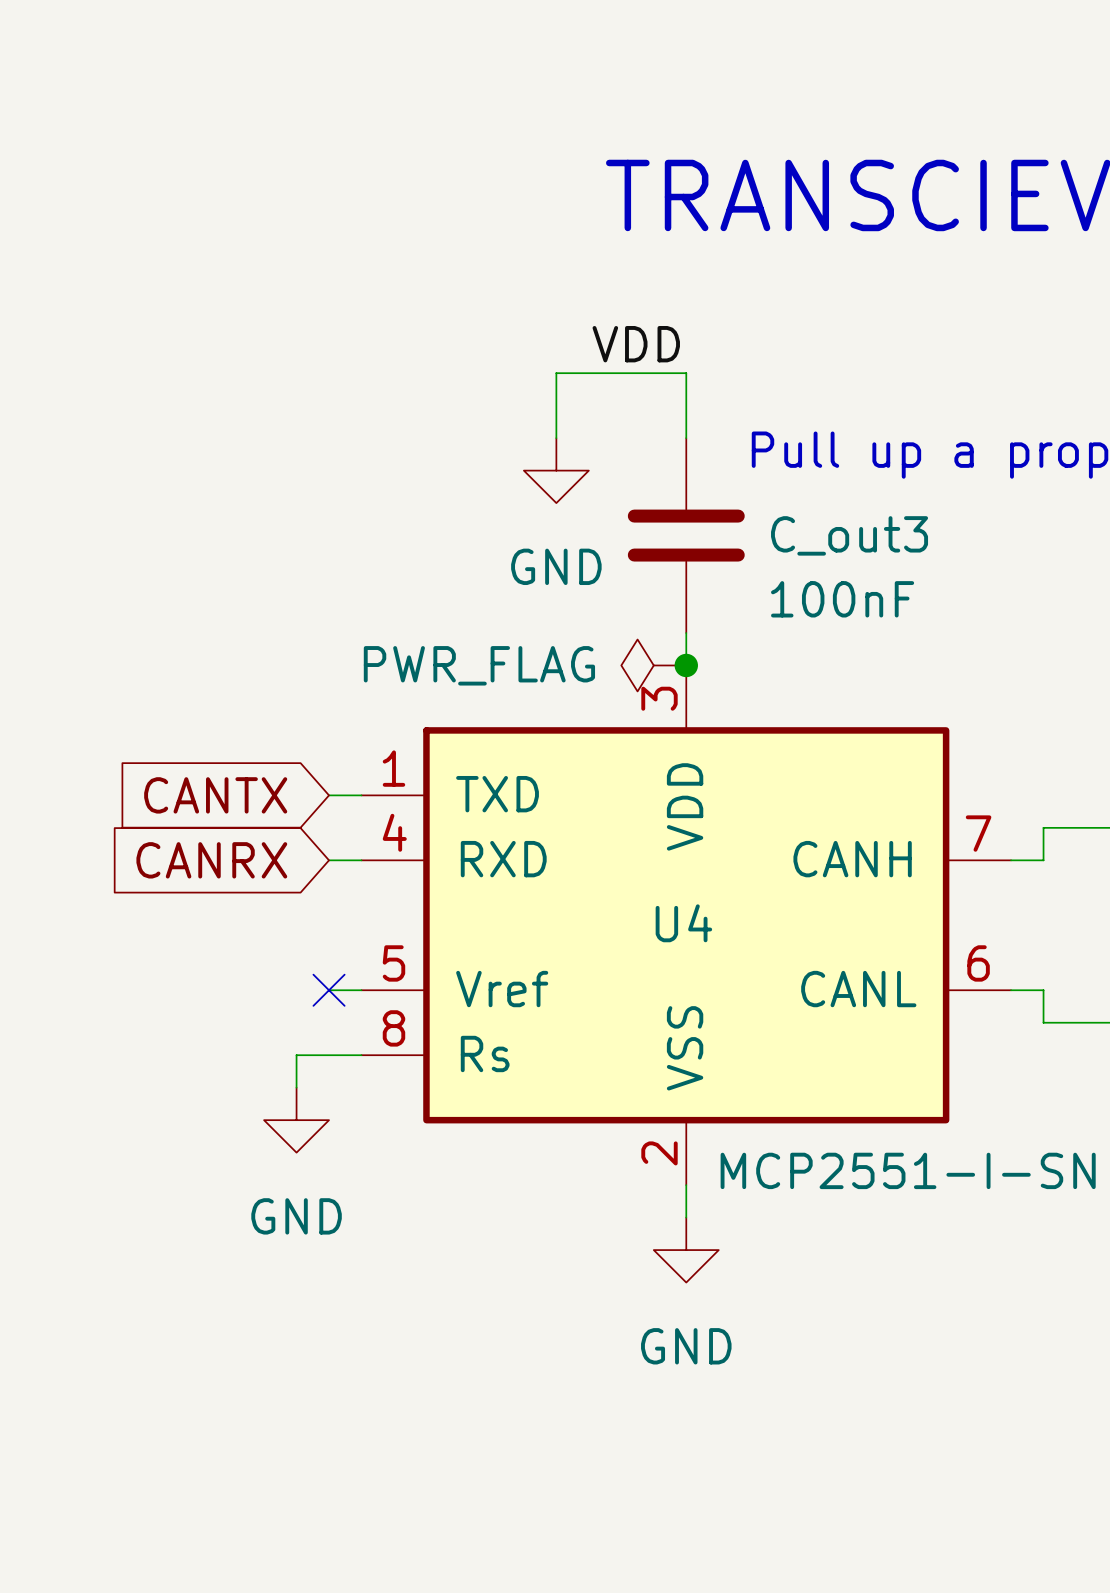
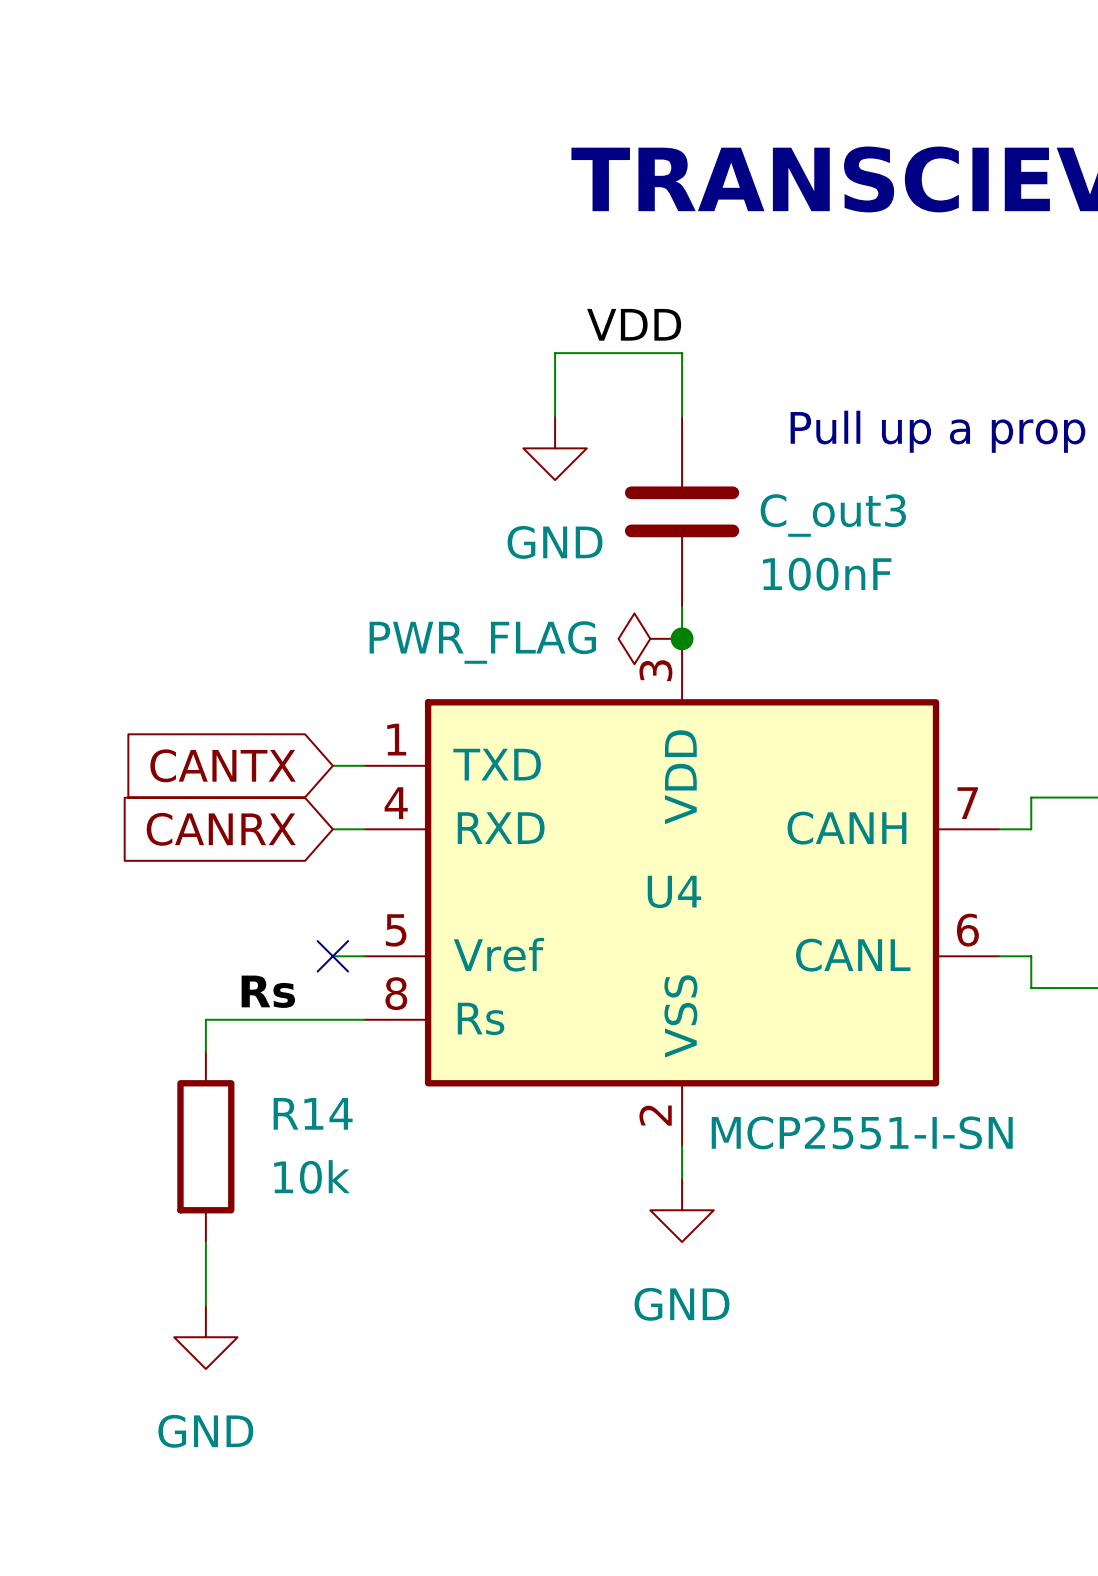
label: none -> Rs (268, 991)
wire: (296, 1055) (296, 1087) -> (301, 1019) (205, 1019) (205, 1051)
power symbol position: GND (296, 1120) -> GND (205, 1337)
R14: none -> 10k (205, 1146)
wire: none -> (205, 1242) (205, 1305)

